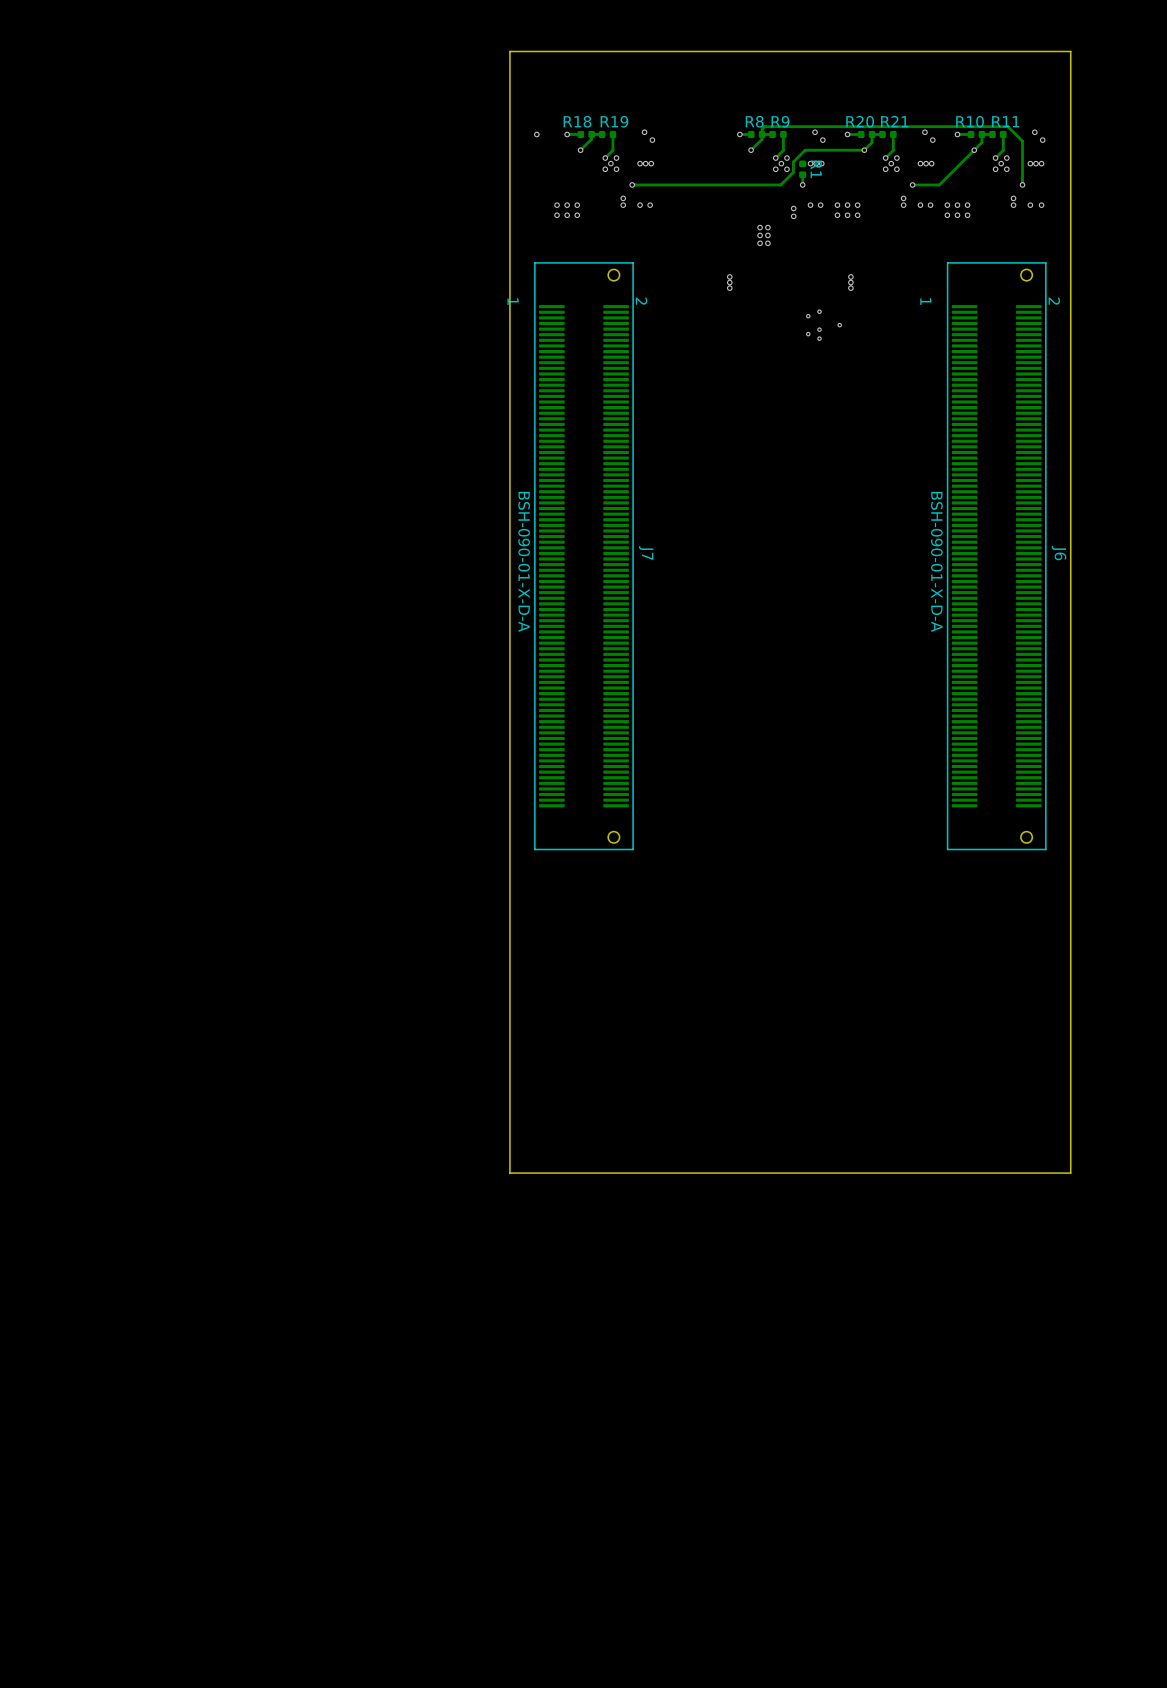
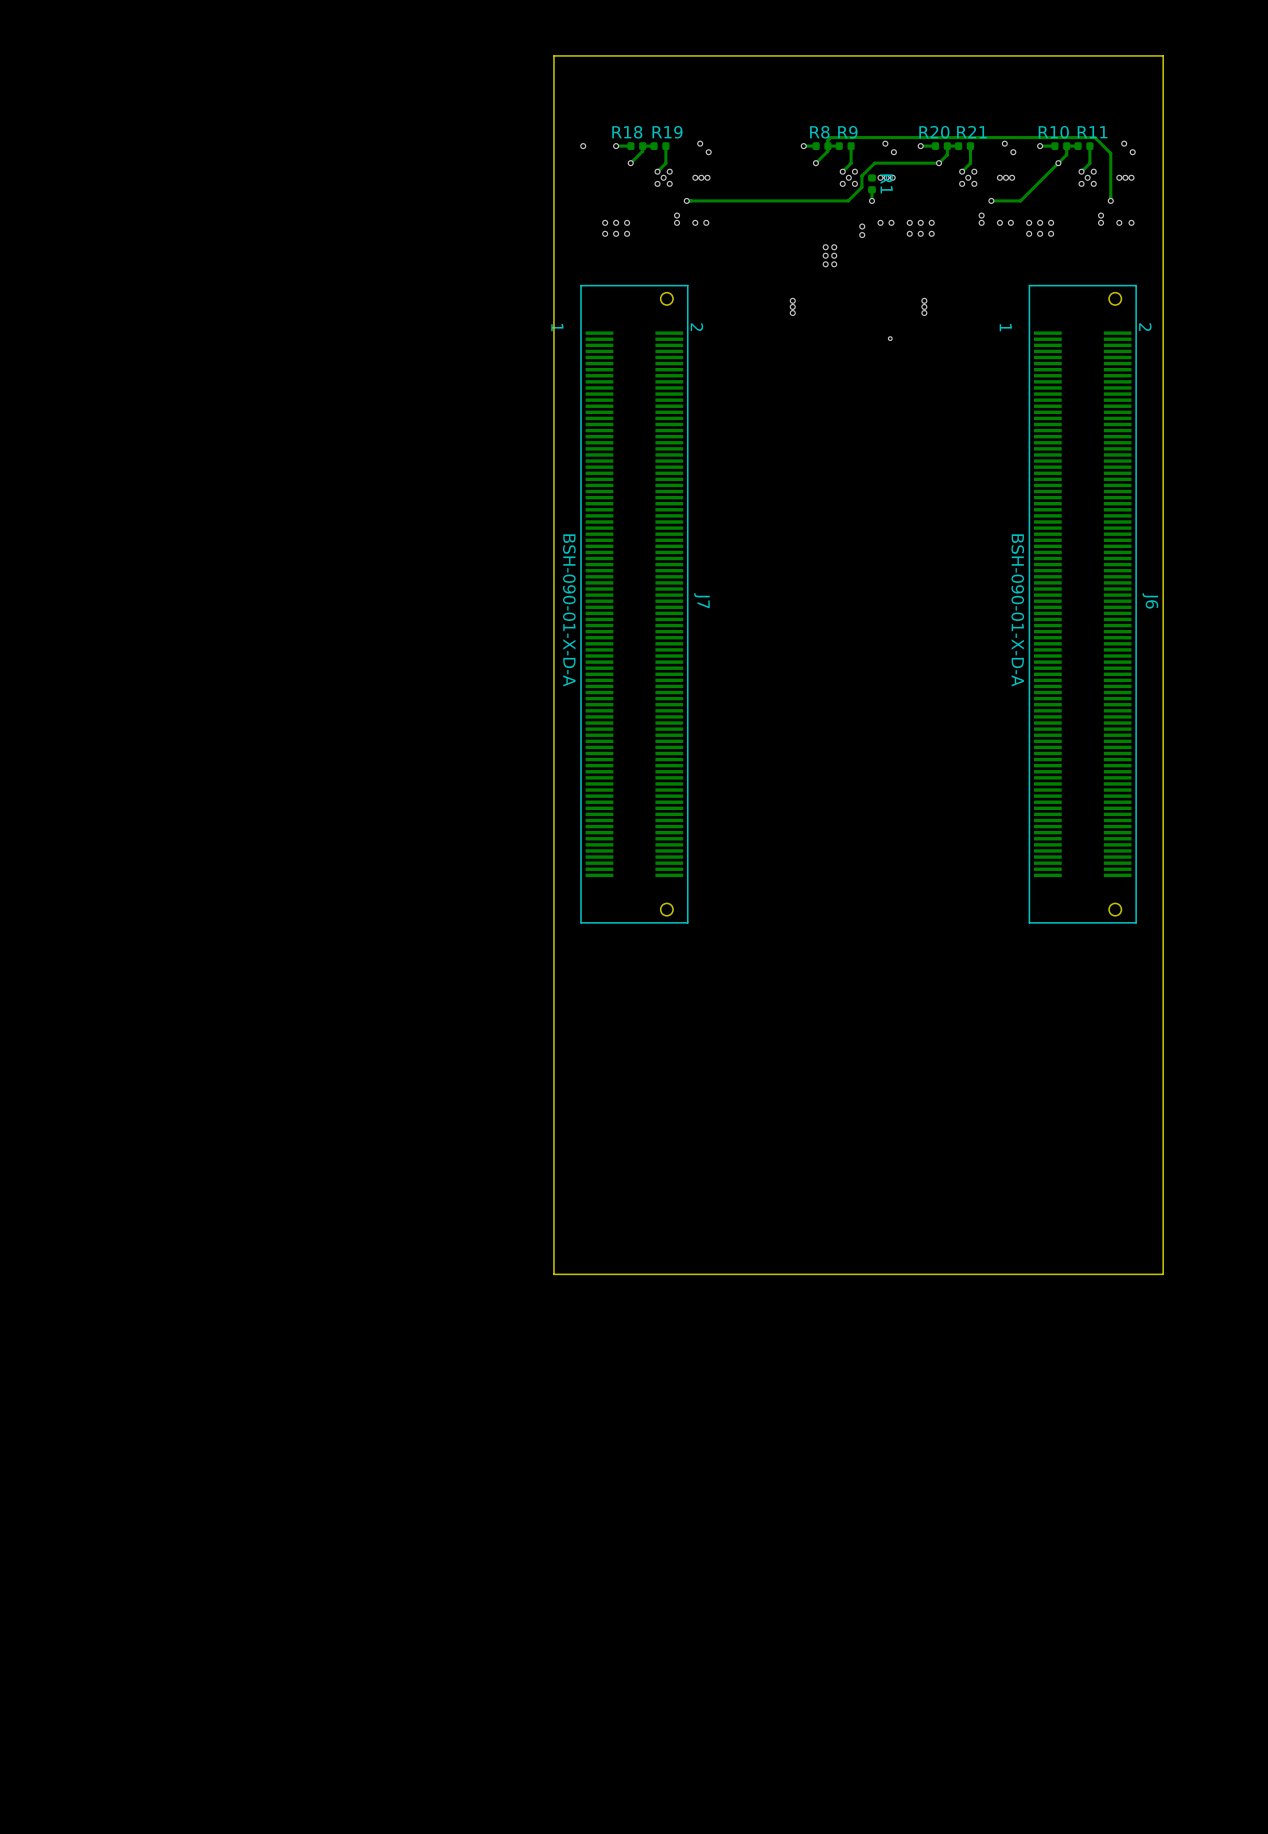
via: (808, 316) -> none
via: (839, 325) -> none
via: (819, 329) -> none
via: (808, 334) -> none
via: (819, 338) -> none

